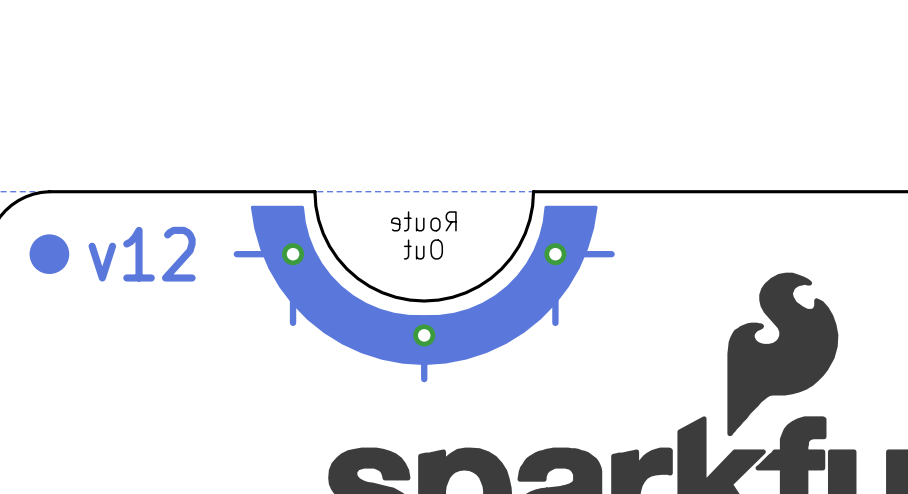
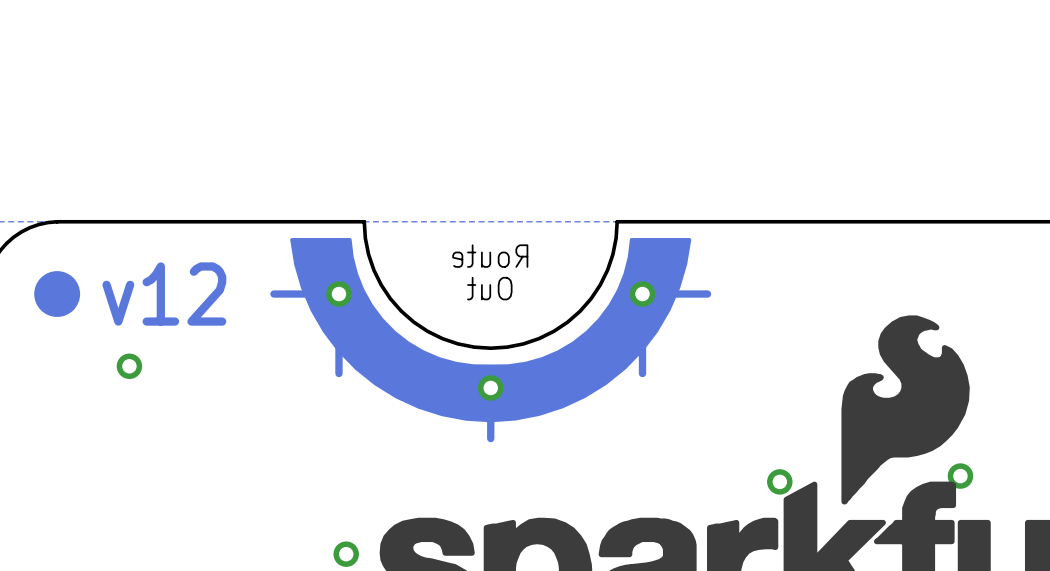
via: none -> (129, 366)
via: none -> (960, 476)
via: none -> (779, 481)
via: none -> (346, 554)

